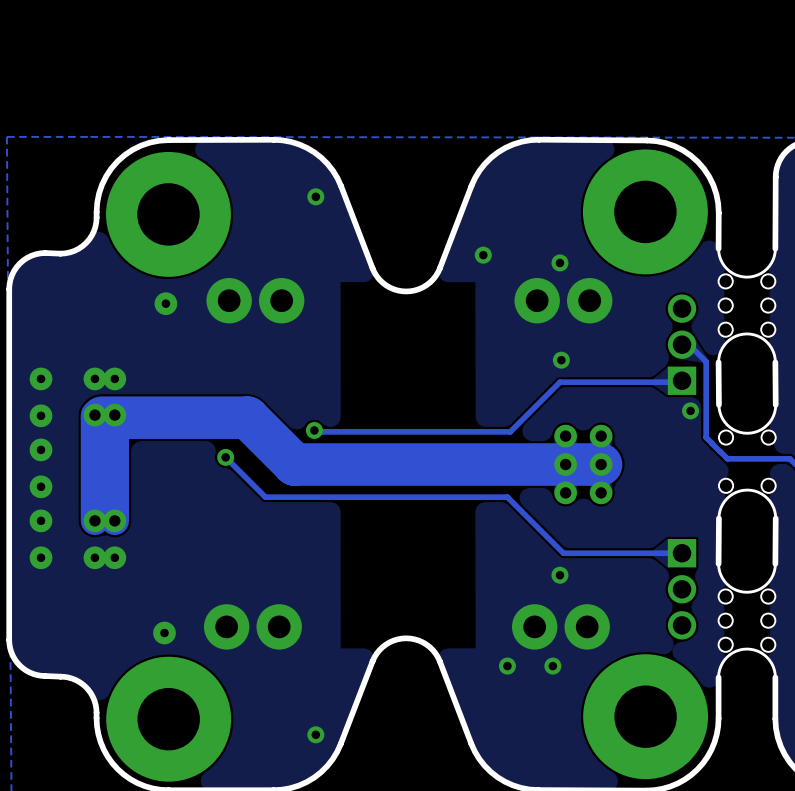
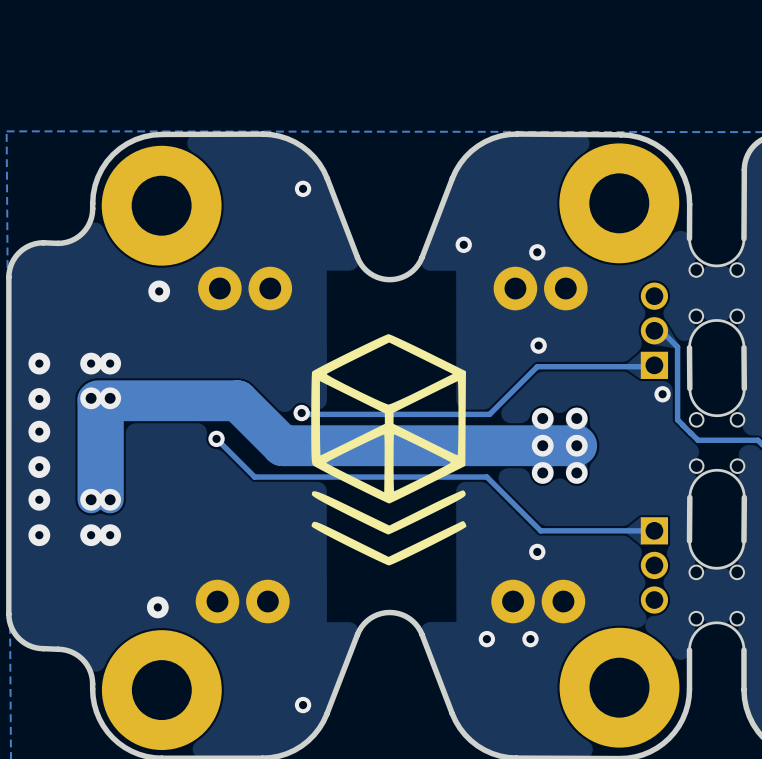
part footprint: [717, 247, 777, 364] -> [688, 237, 746, 350]
drawing: none -> [311, 334, 467, 566]
part footprint: [717, 562, 777, 679] -> [688, 539, 746, 652]

